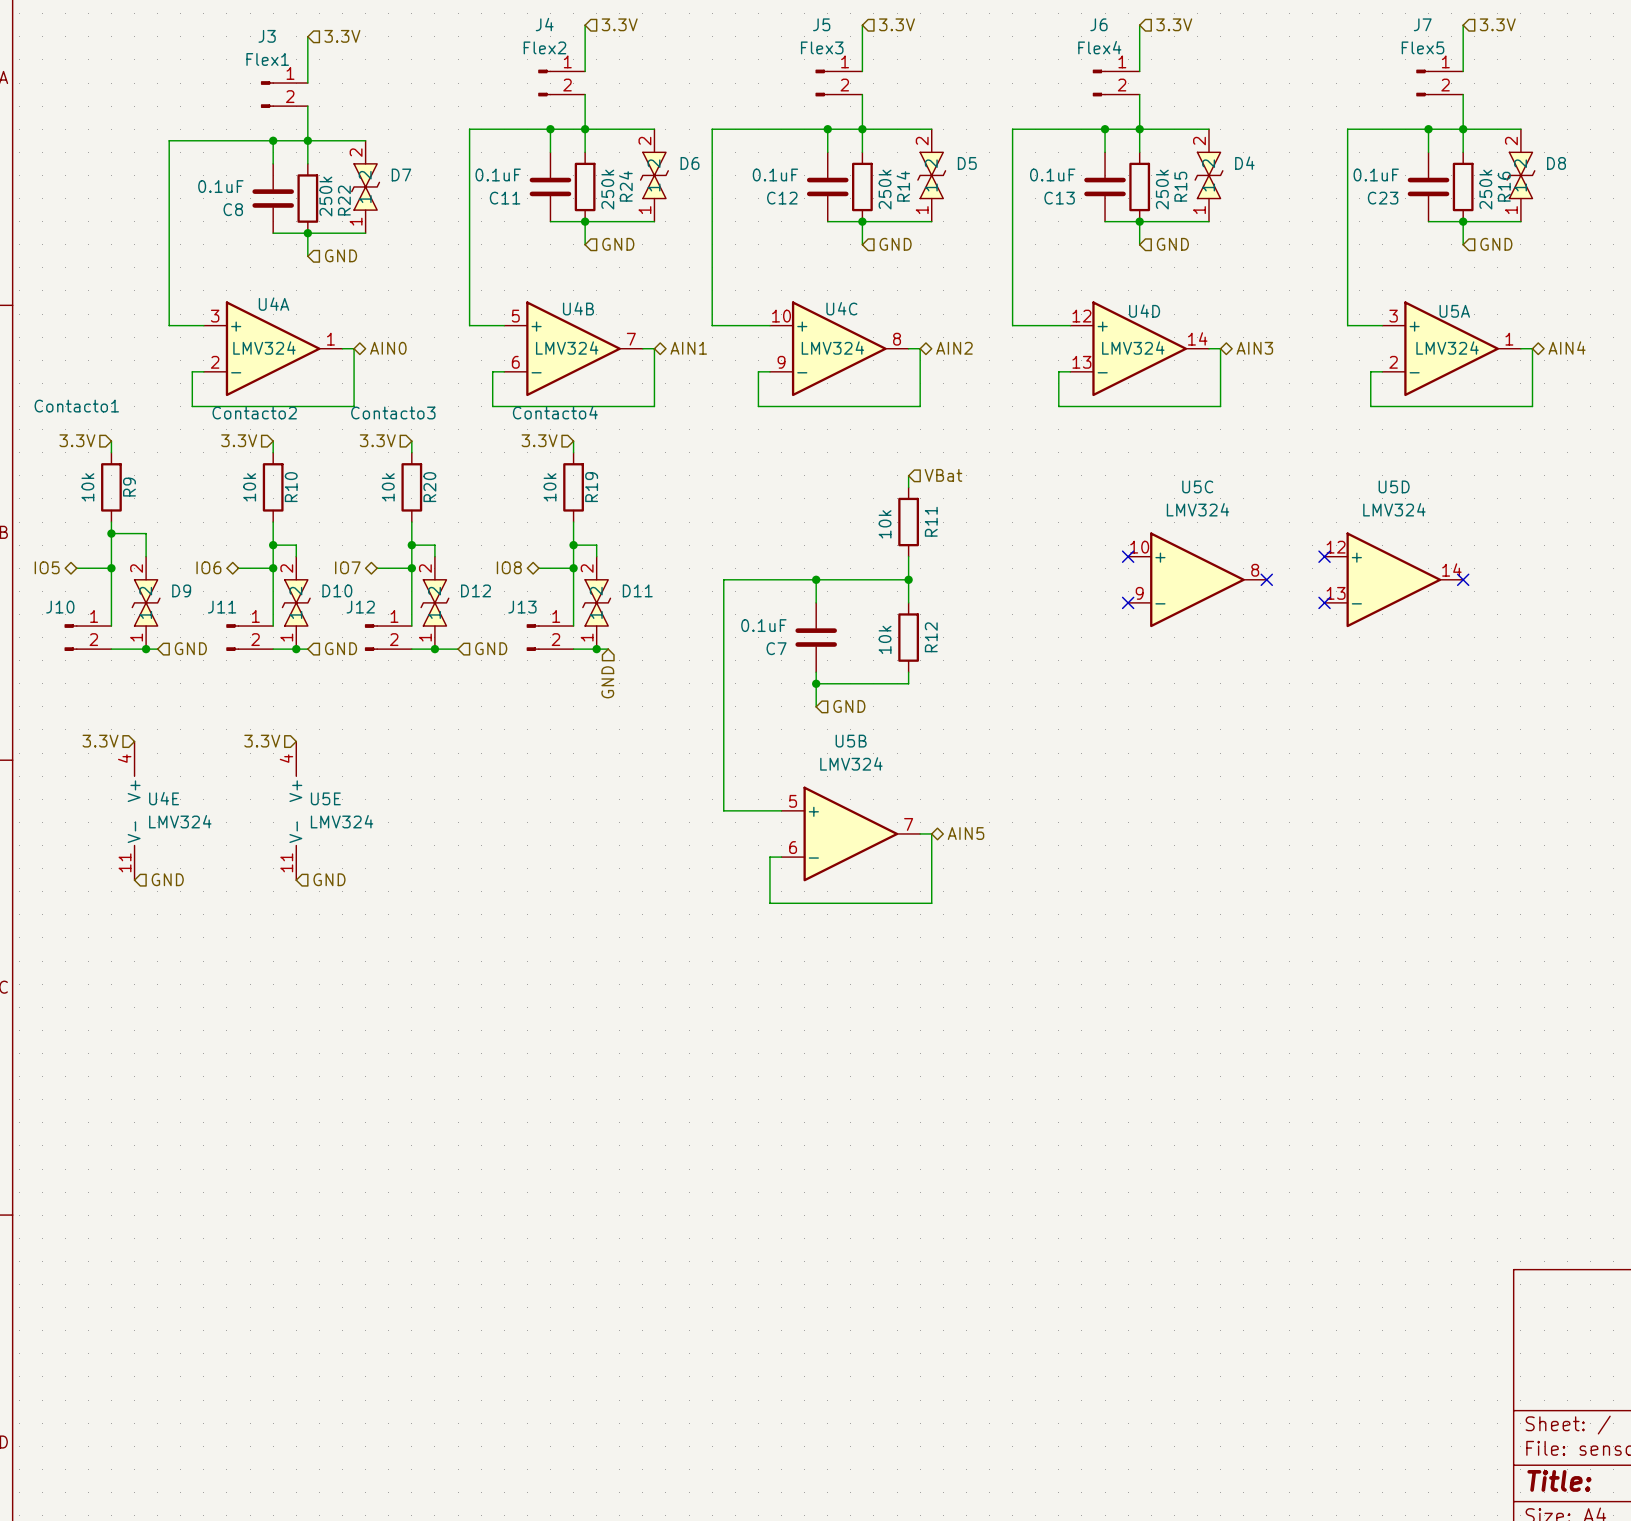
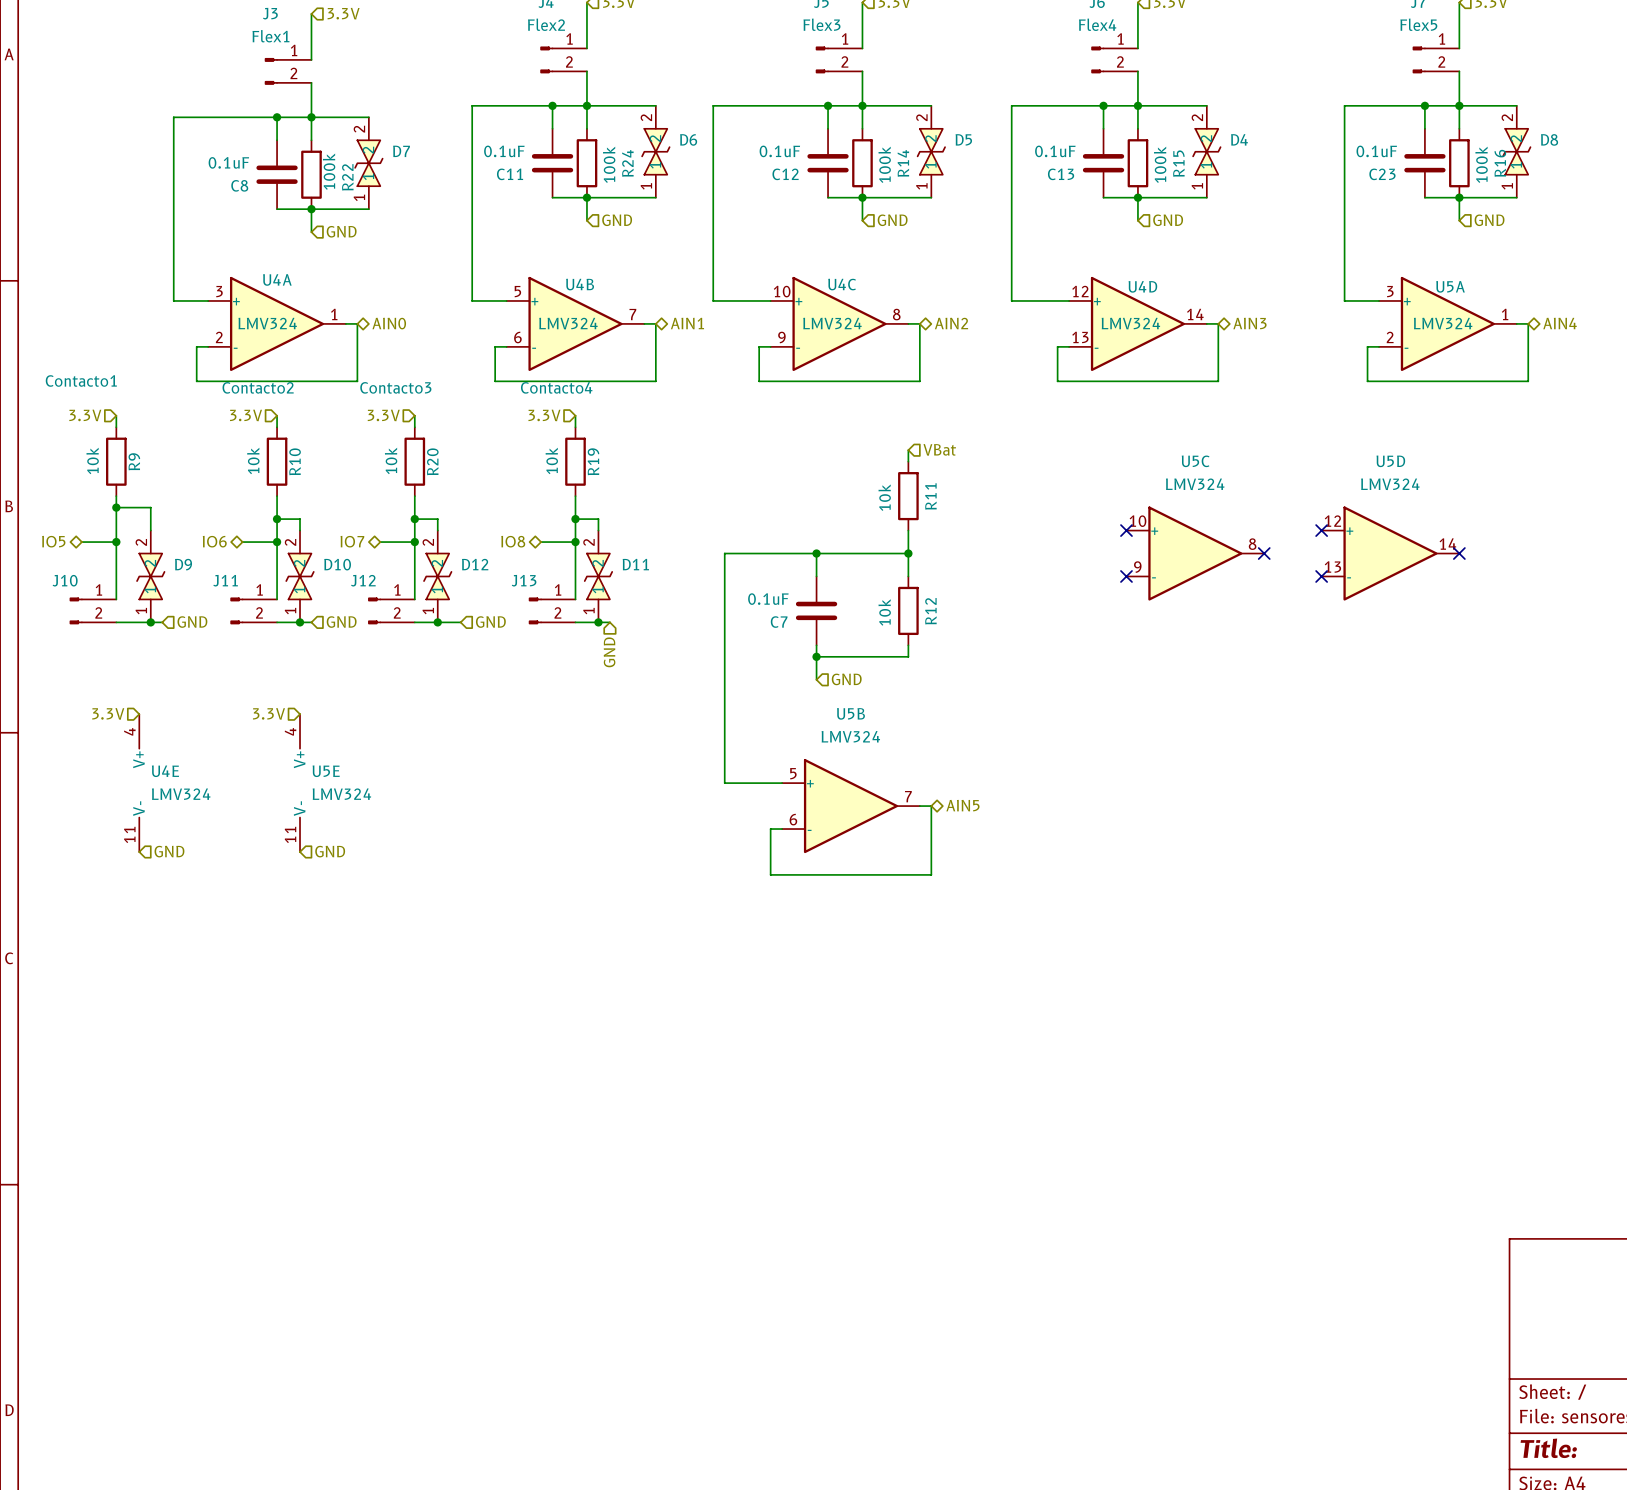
R24 value: 250k (607, 189) -> 100k (609, 164)
R14 value: 250k (885, 189) -> 100k (884, 164)
R15 value: 250k (1162, 189) -> 100k (1160, 164)
R16 value: 250k (1485, 189) -> 100k (1481, 164)
R22 value: 250k (325, 196) -> 100k (329, 171)

